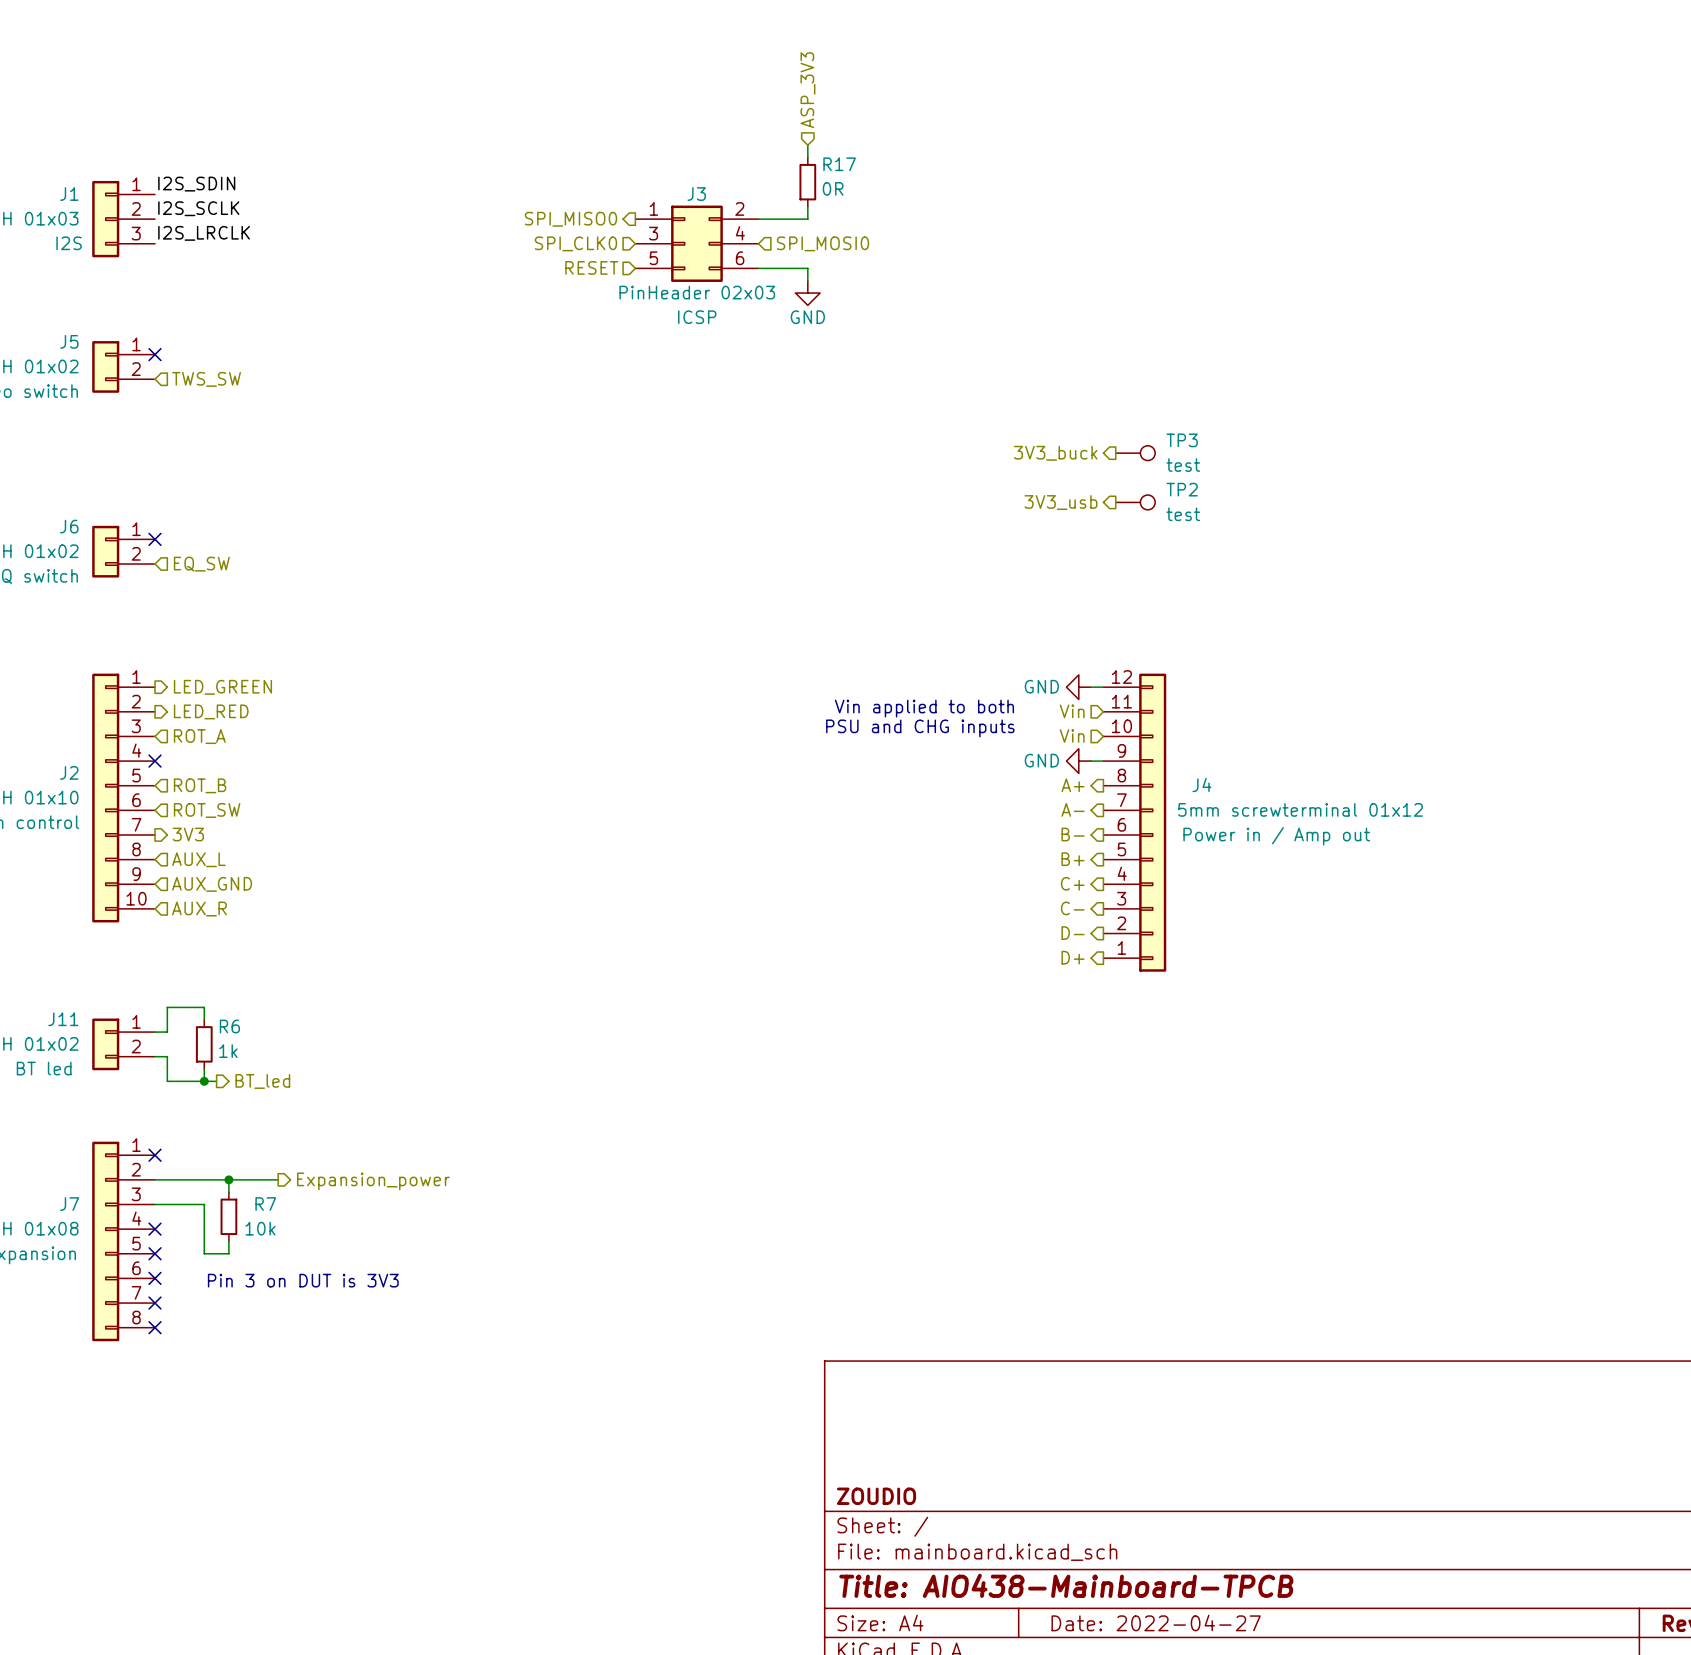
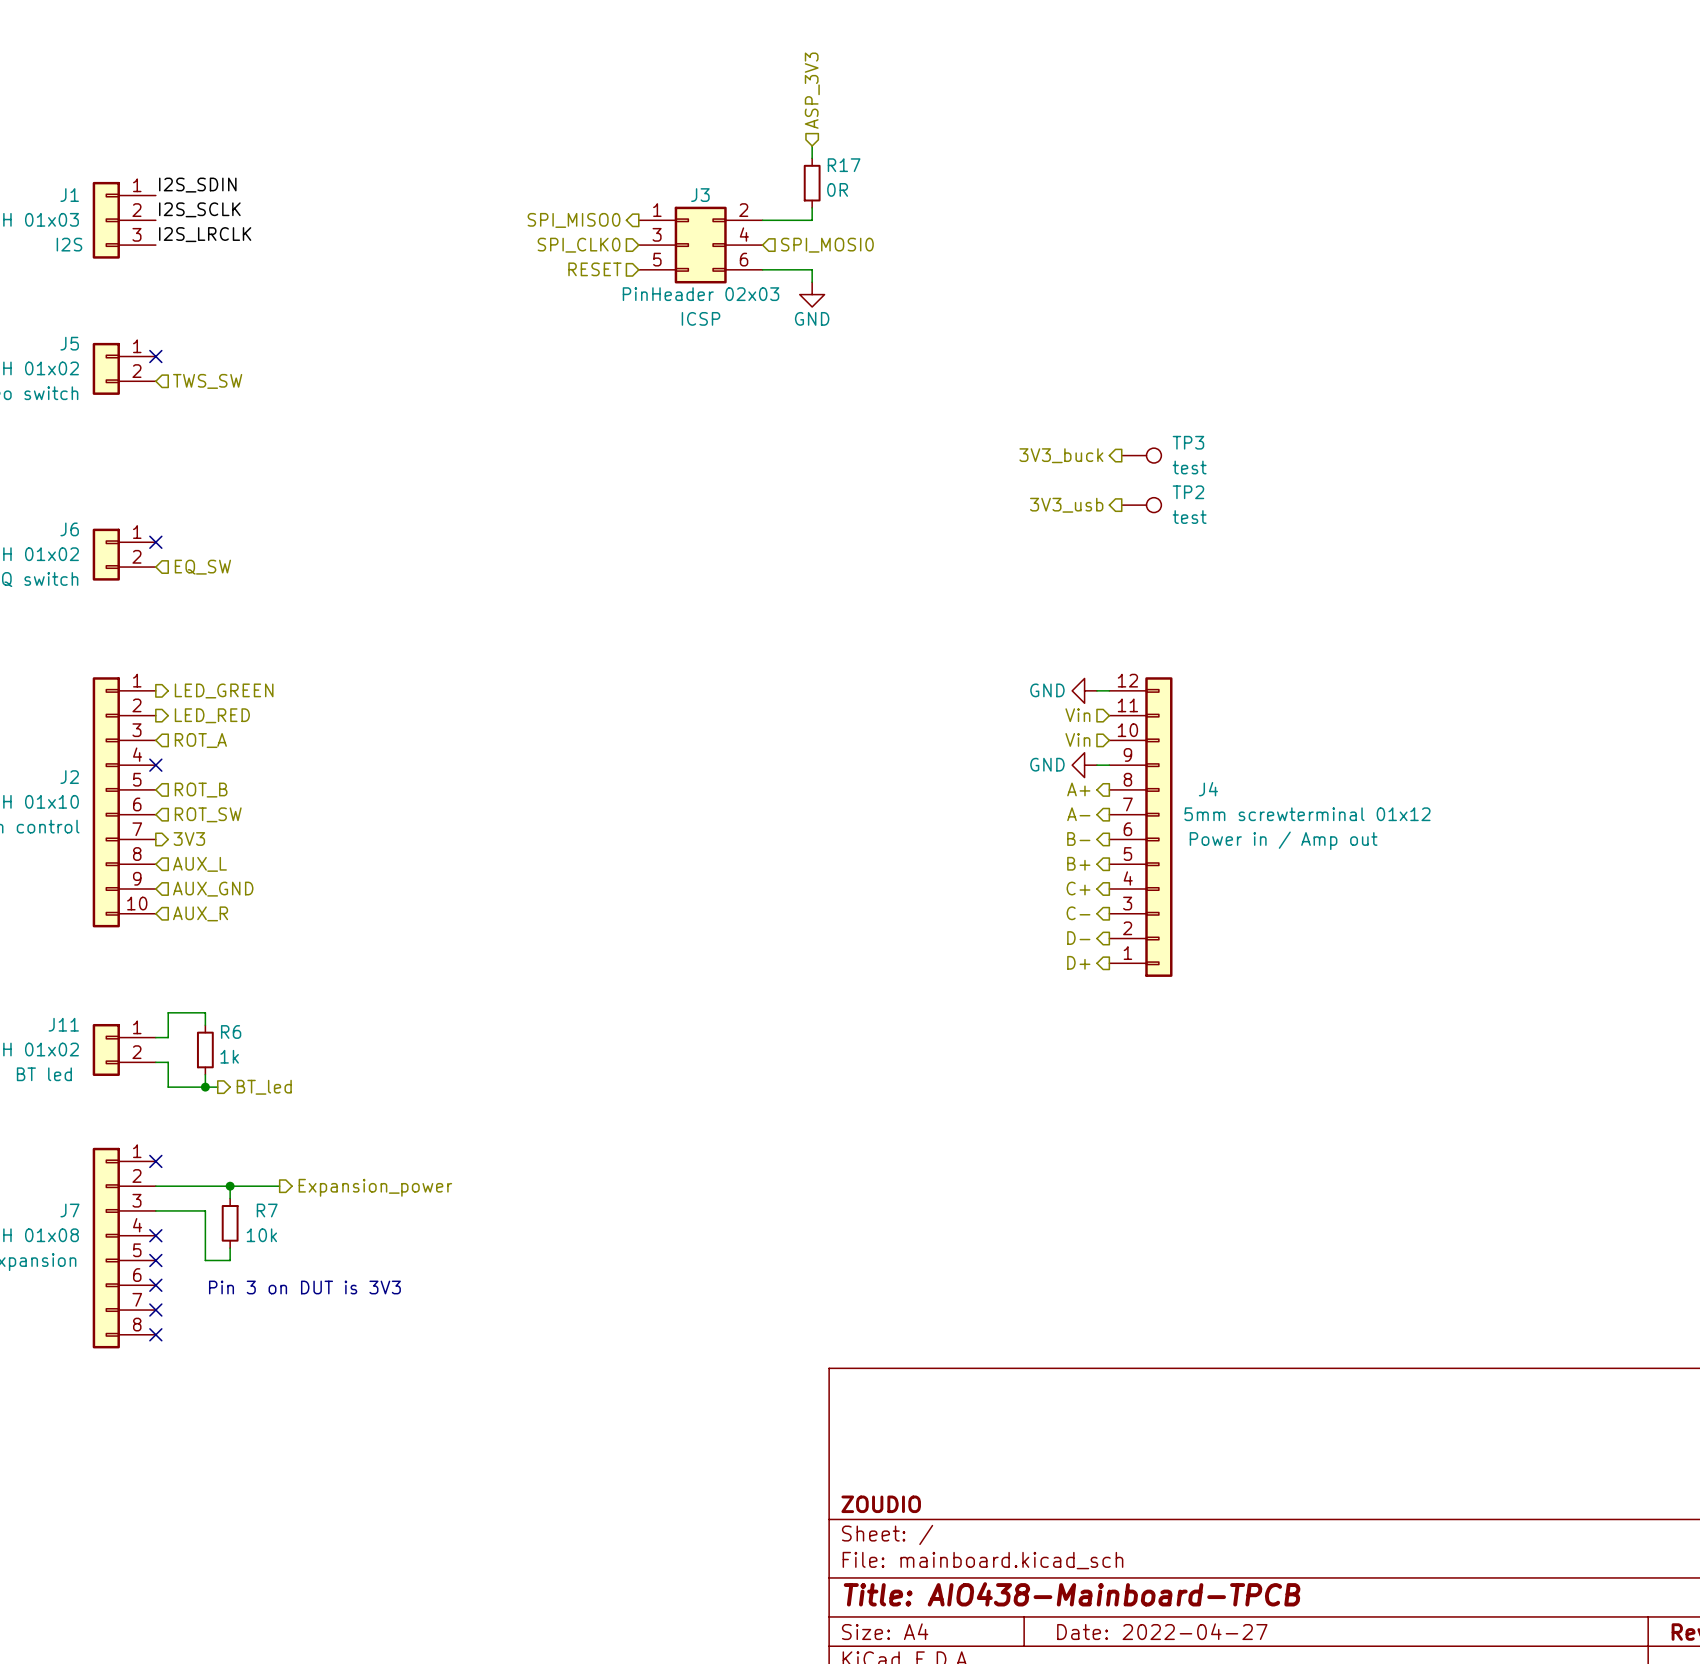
text: Vin applied to both (924, 708) -> none
text: PSU and CHG inputs (920, 728) -> none

